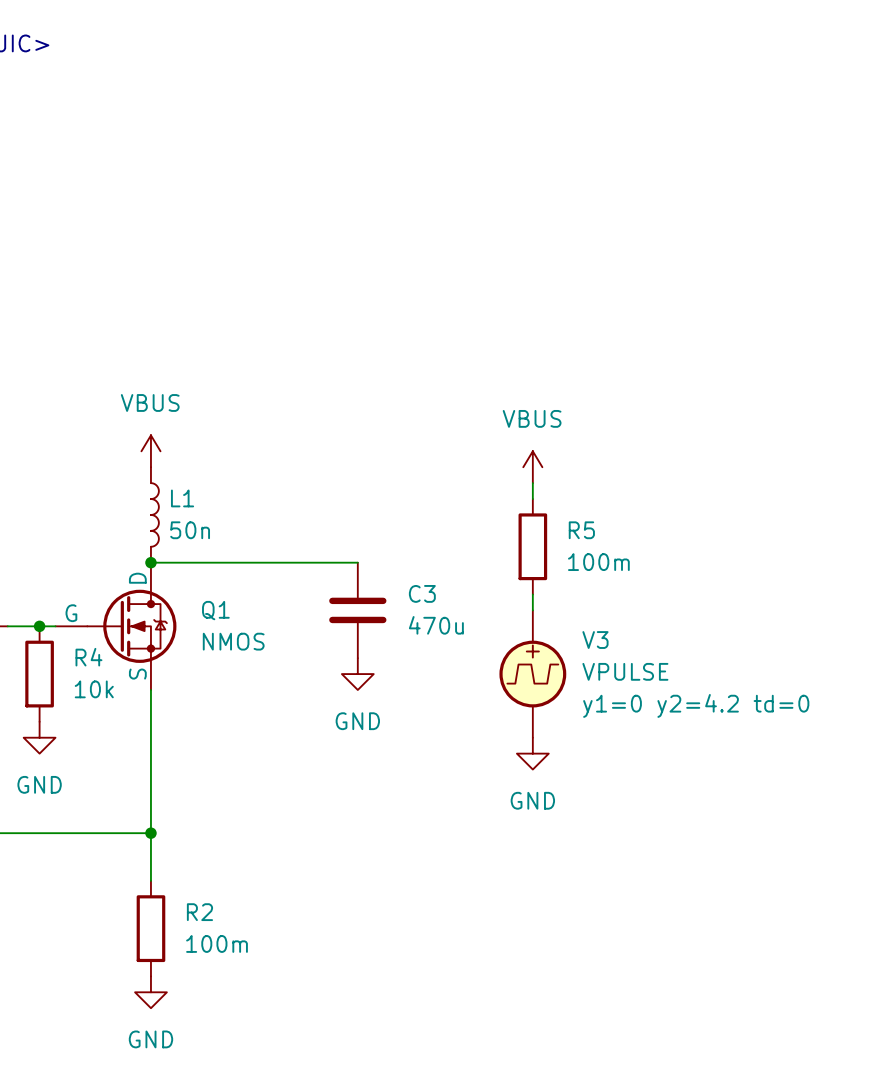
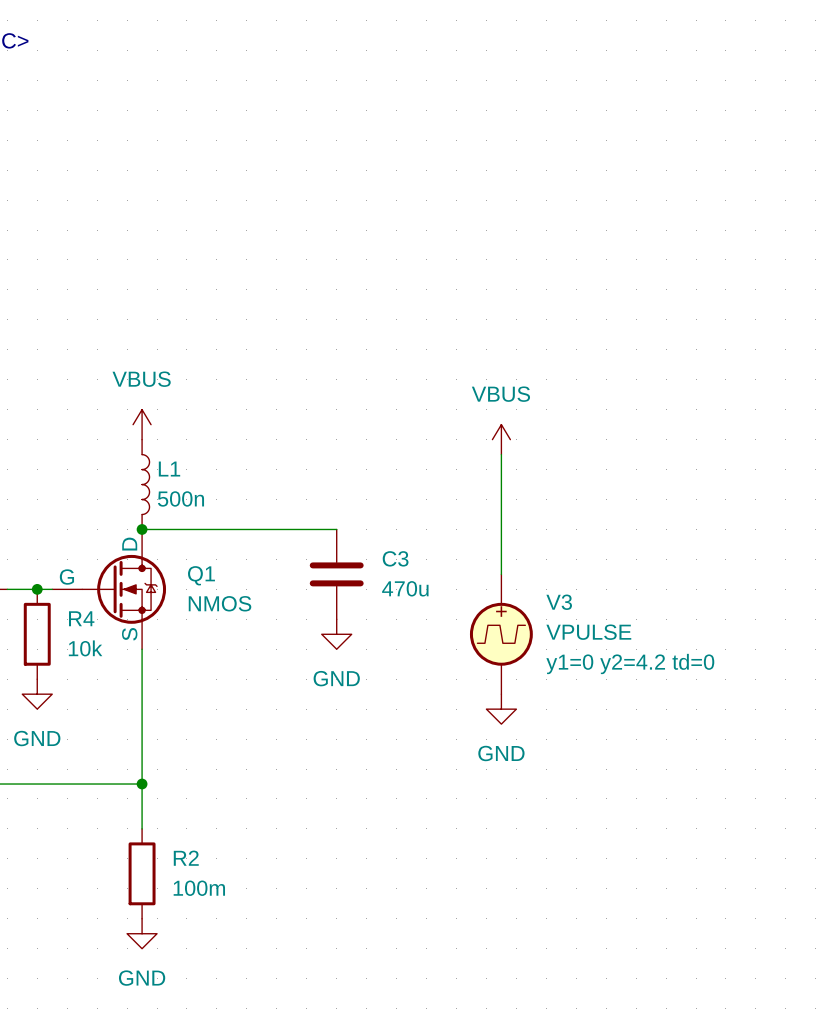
wire: none -> (501, 469) (501, 559)
L1 value: 50n (190, 530) -> 500n (180, 498)
R5: 100m (532, 546) -> none

